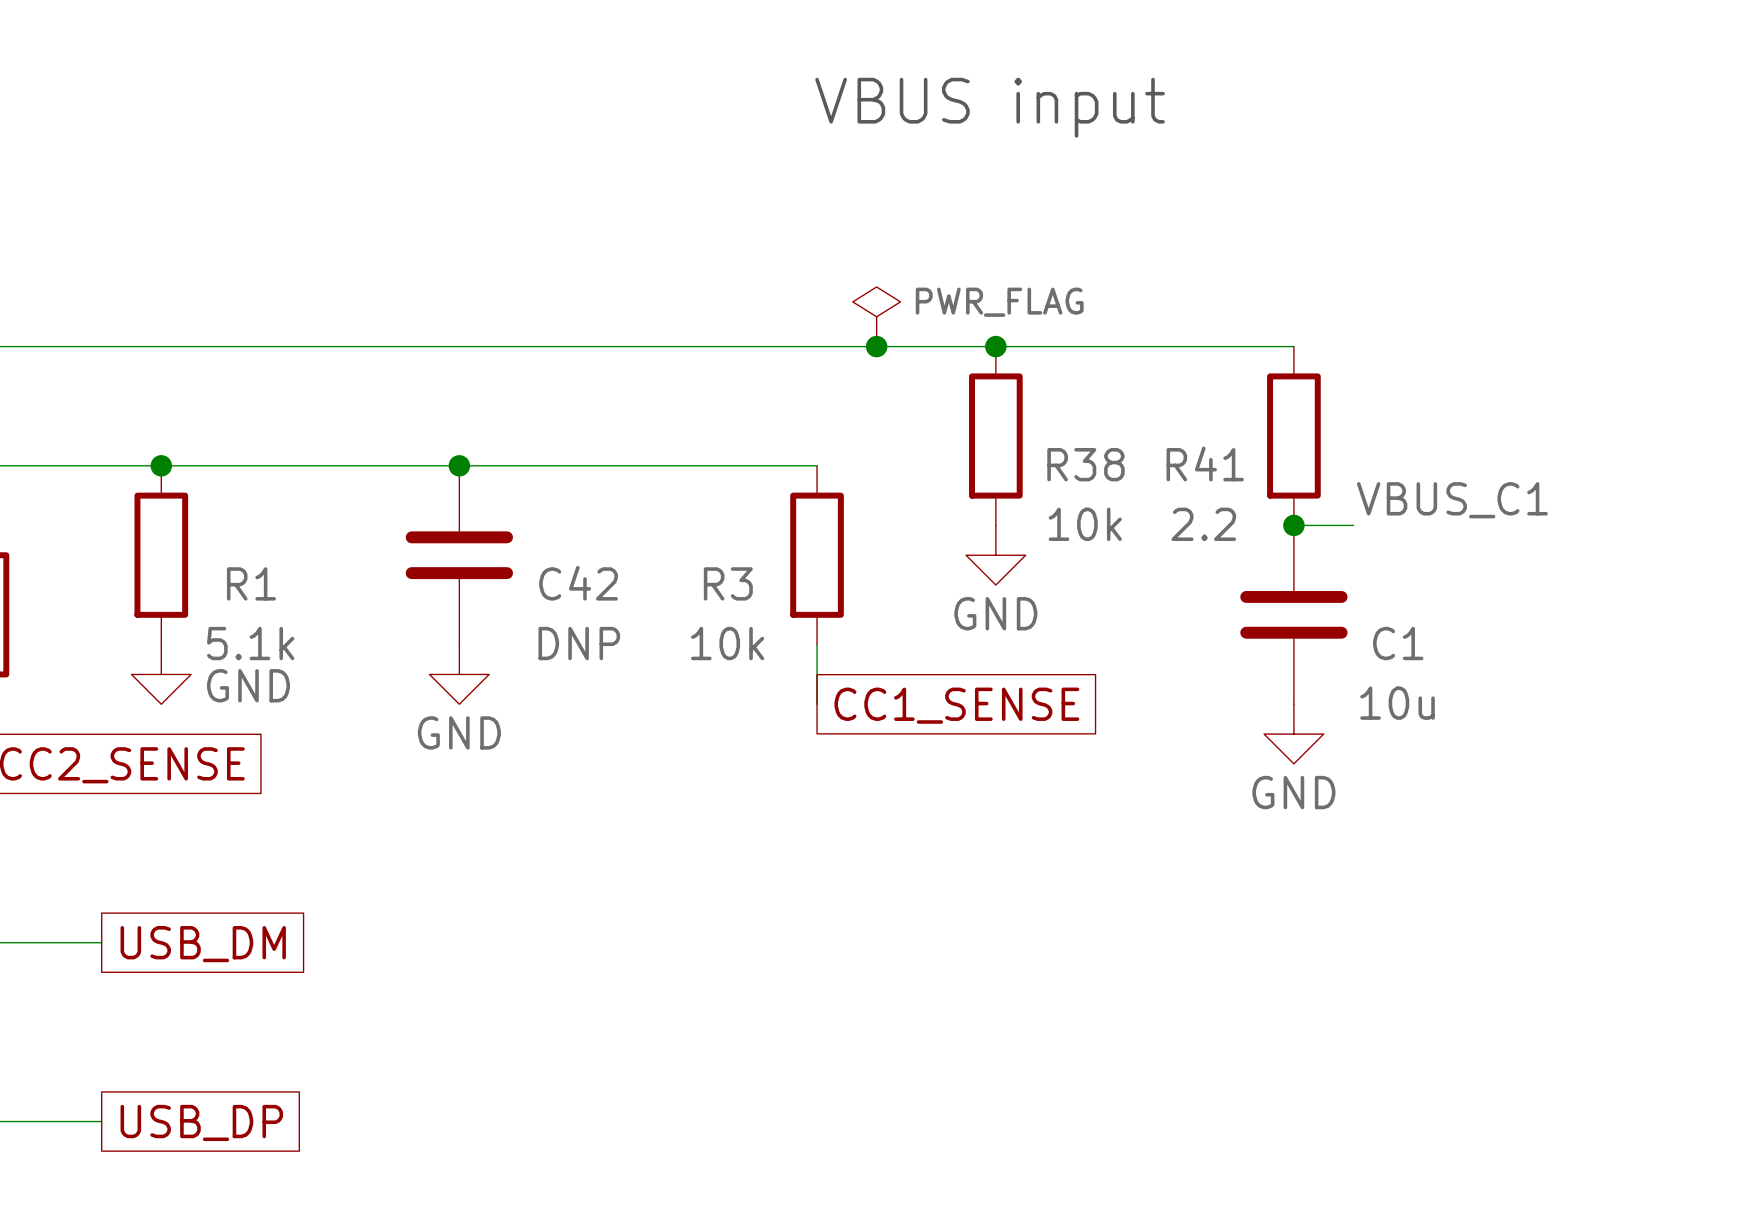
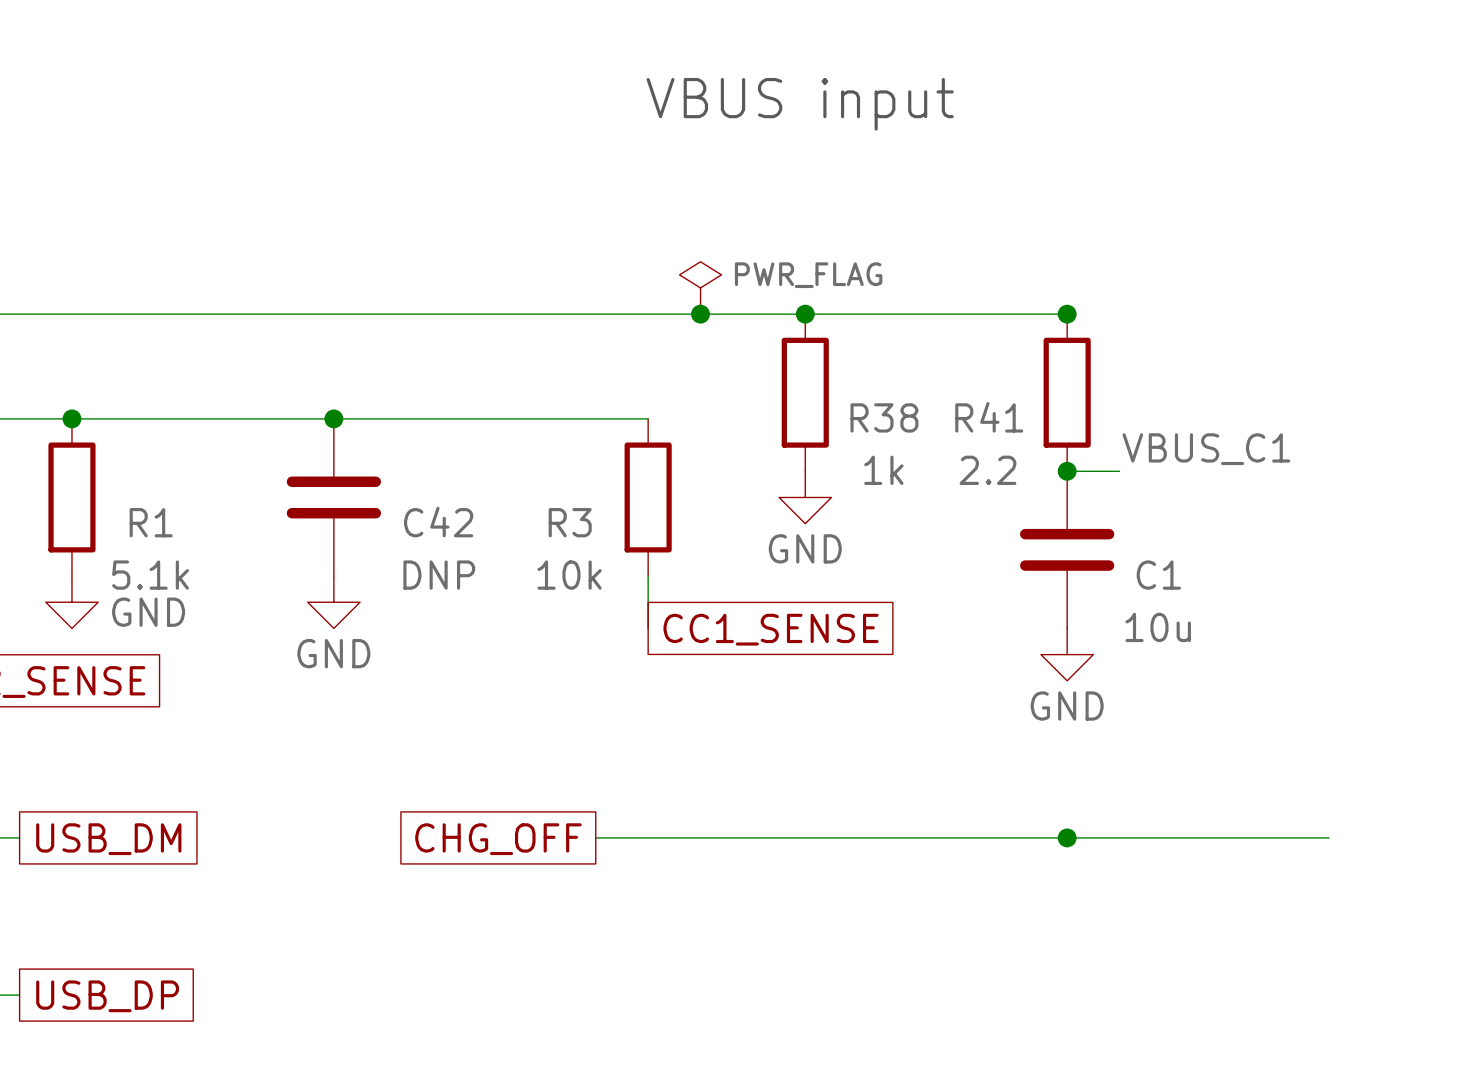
junction: none -> (1067, 314)
R38 value: 10k (1085, 524) -> 1k (883, 470)
wire: none -> (595, 837) (1329, 837)
junction: none -> (1067, 837)
global label: none -> CHG_OFF (498, 839)

